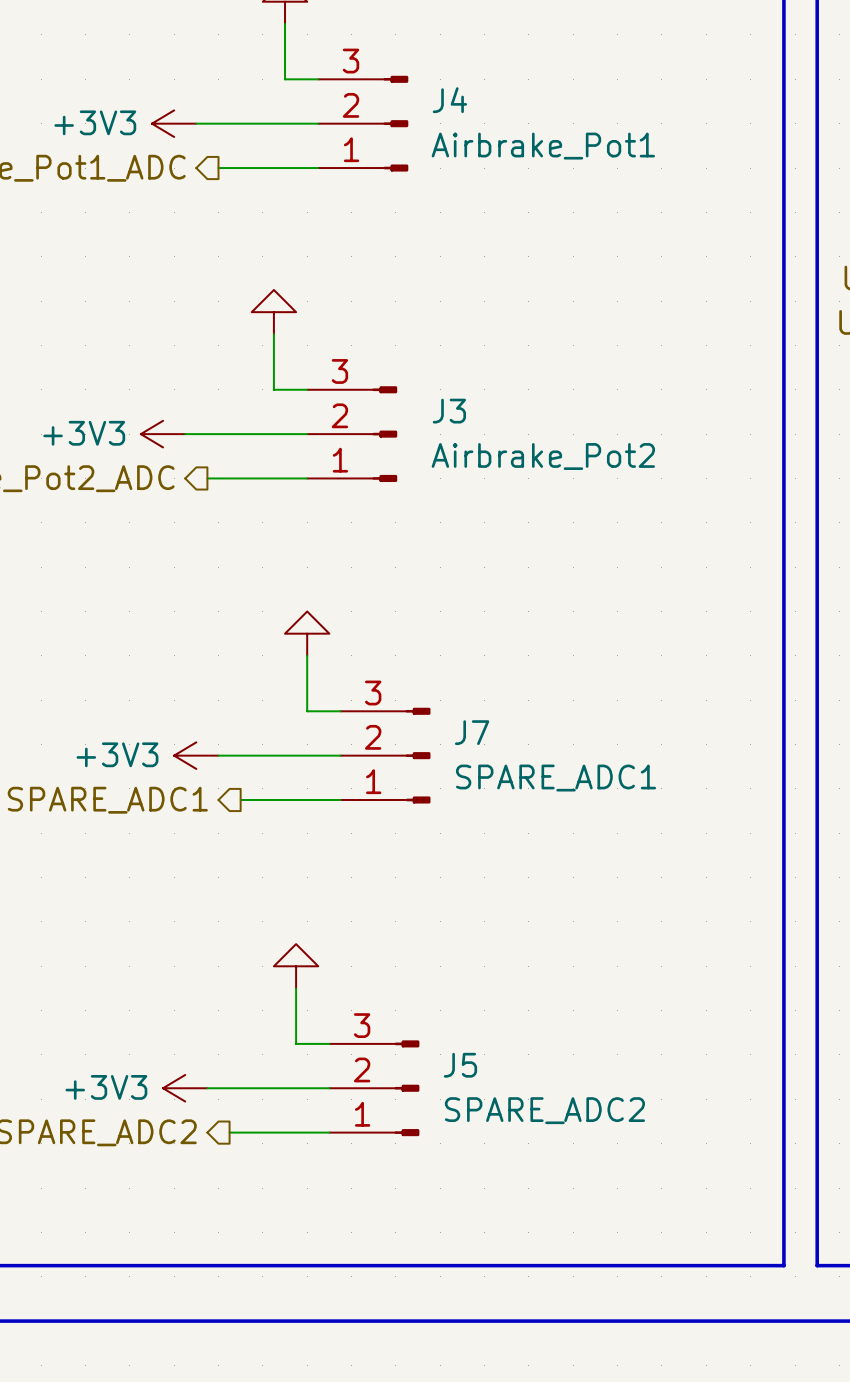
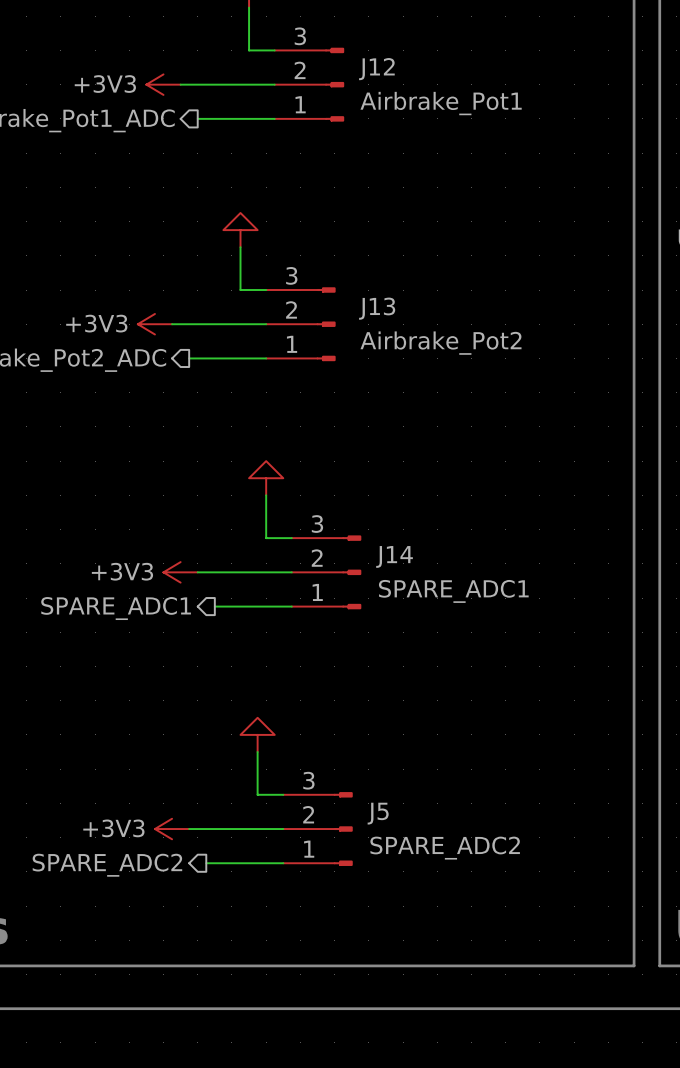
J4 name: J4 (449, 100) -> J12 (376, 69)
J3 name: J3 (449, 411) -> J13 (377, 308)
J7 name: J7 (472, 732) -> J14 (394, 556)

